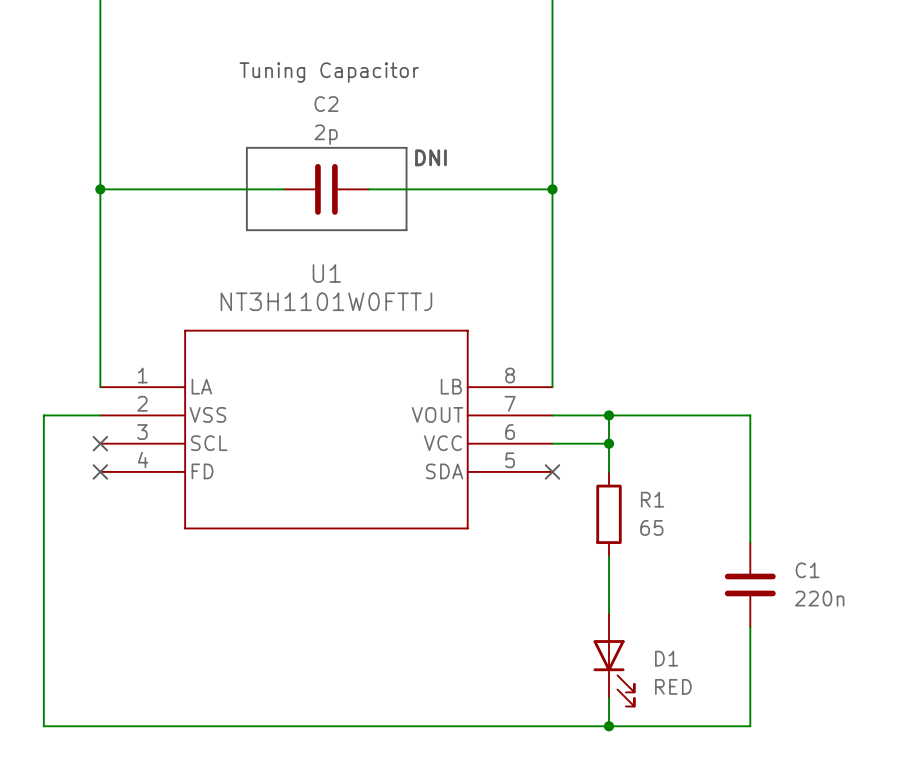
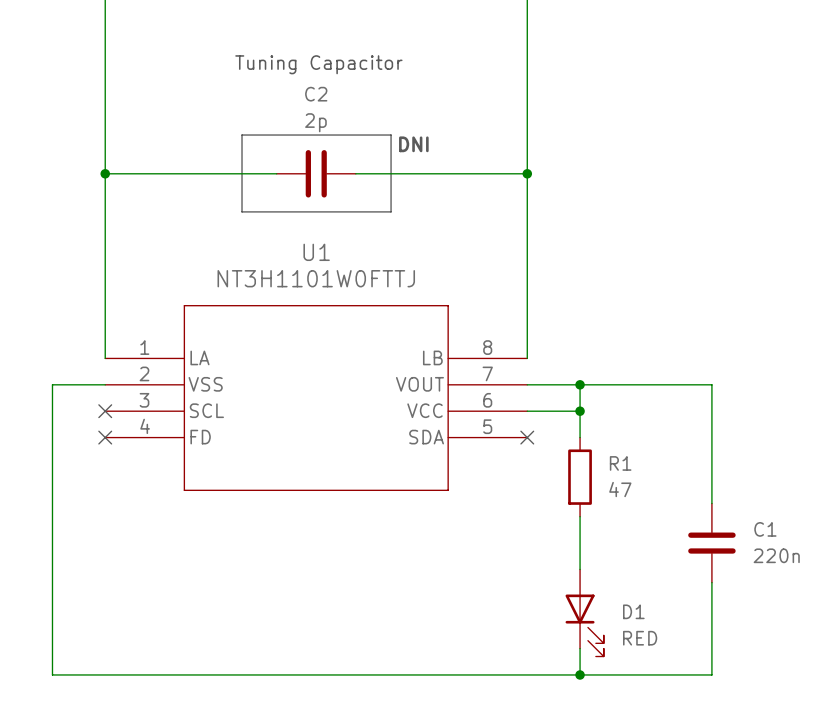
R1 value: 65 (651, 527) -> 47 (620, 489)

